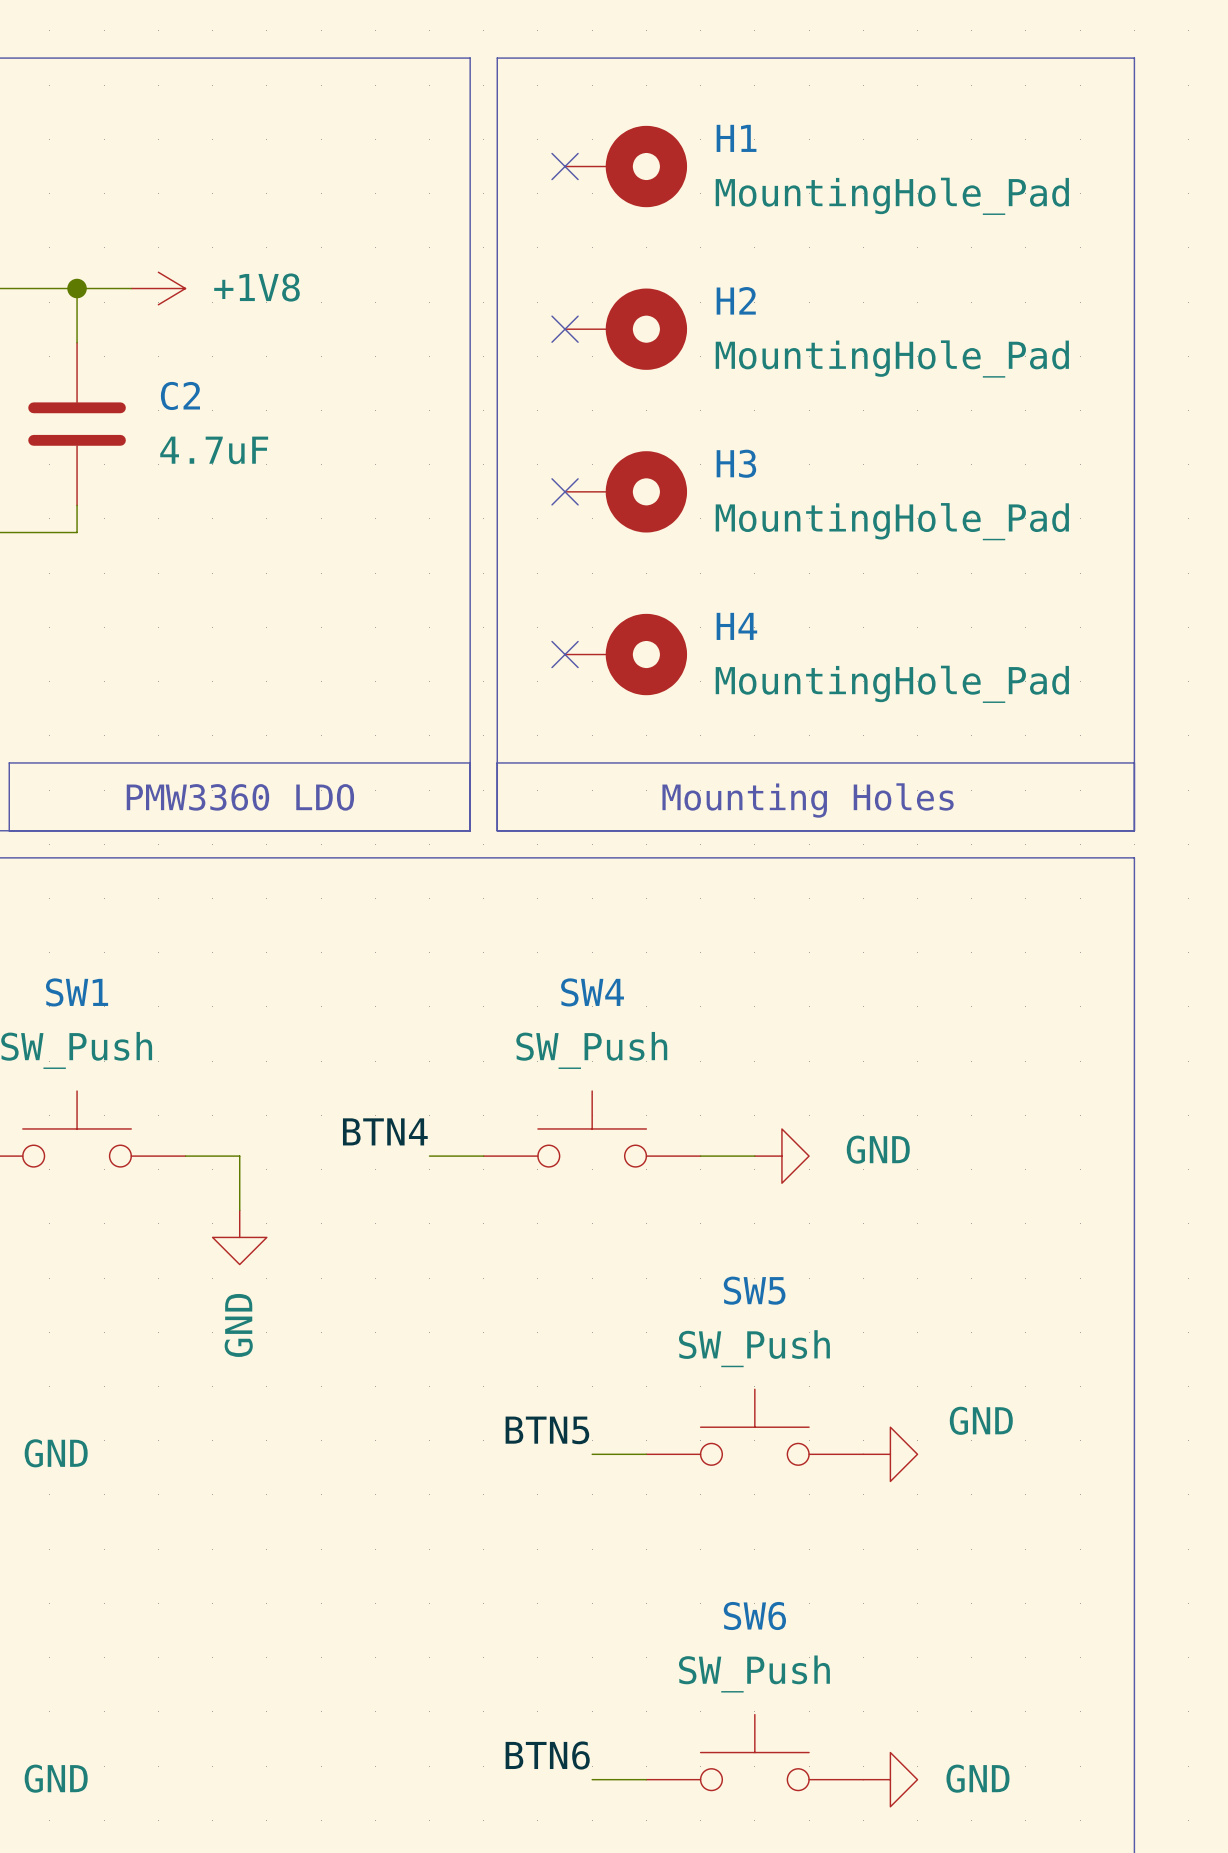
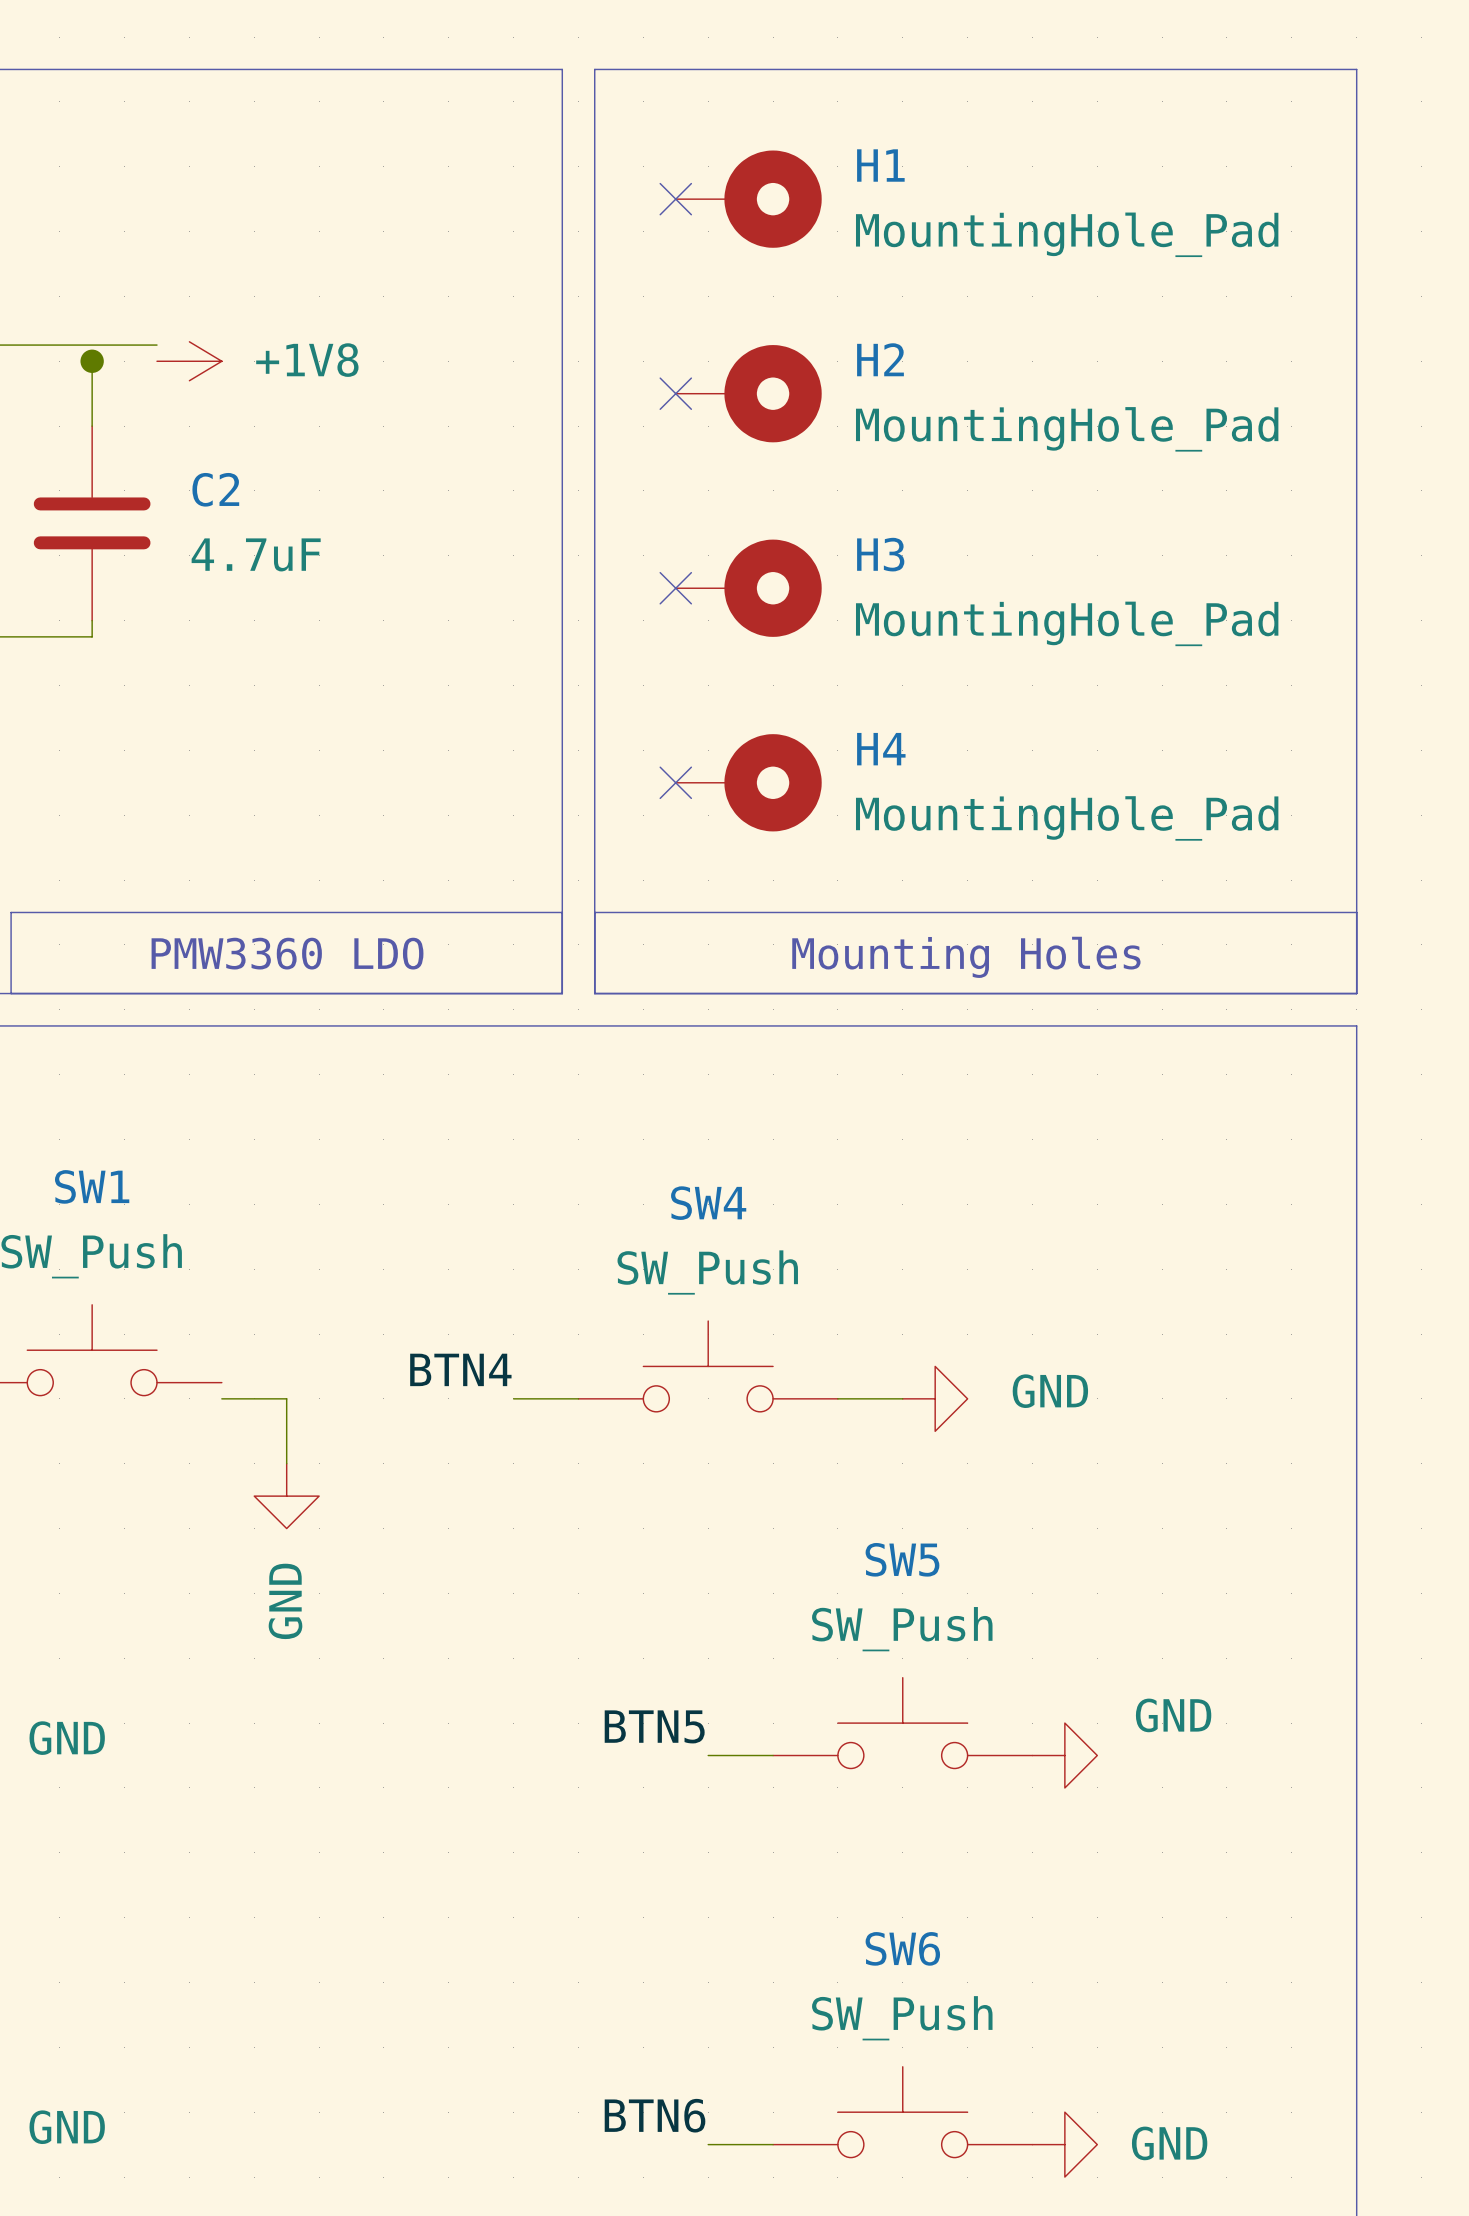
junction position: (77, 288) -> (92, 361)
power symbol position: +1V8 (158, 288) -> +1V8 (189, 361)
C2 position: (77, 424) -> (92, 523)
SW4 position: (592, 1128) -> (708, 1366)
label position: BTN4 (385, 1131) -> BTN4 (460, 1369)
wire: (185, 1156) (239, 1156) (239, 1169) -> (221, 1398) (286, 1398)
wire: (429, 1156) (483, 1156) -> (513, 1398) (578, 1398)
wire: (700, 1156) (754, 1156) -> (837, 1398) (902, 1398)
power symbol position: GND (781, 1156) -> GND (935, 1398)
power symbol position: GND (239, 1237) -> GND (286, 1496)
SW5 position: (754, 1427) -> (902, 1723)
label position: BTN5 (547, 1430) -> BTN5 (654, 1726)
wire: (592, 1454) (646, 1454) -> (708, 1755) (773, 1755)
power symbol position: GND (890, 1454) -> GND (1064, 1755)
SW6 position: (754, 1752) -> (902, 2112)
label position: BTN6 (547, 1755) -> BTN6 (655, 2115)
wire: (592, 1779) (646, 1779) -> (708, 2144) (773, 2144)
power symbol position: GND (890, 1779) -> GND (1064, 2144)

